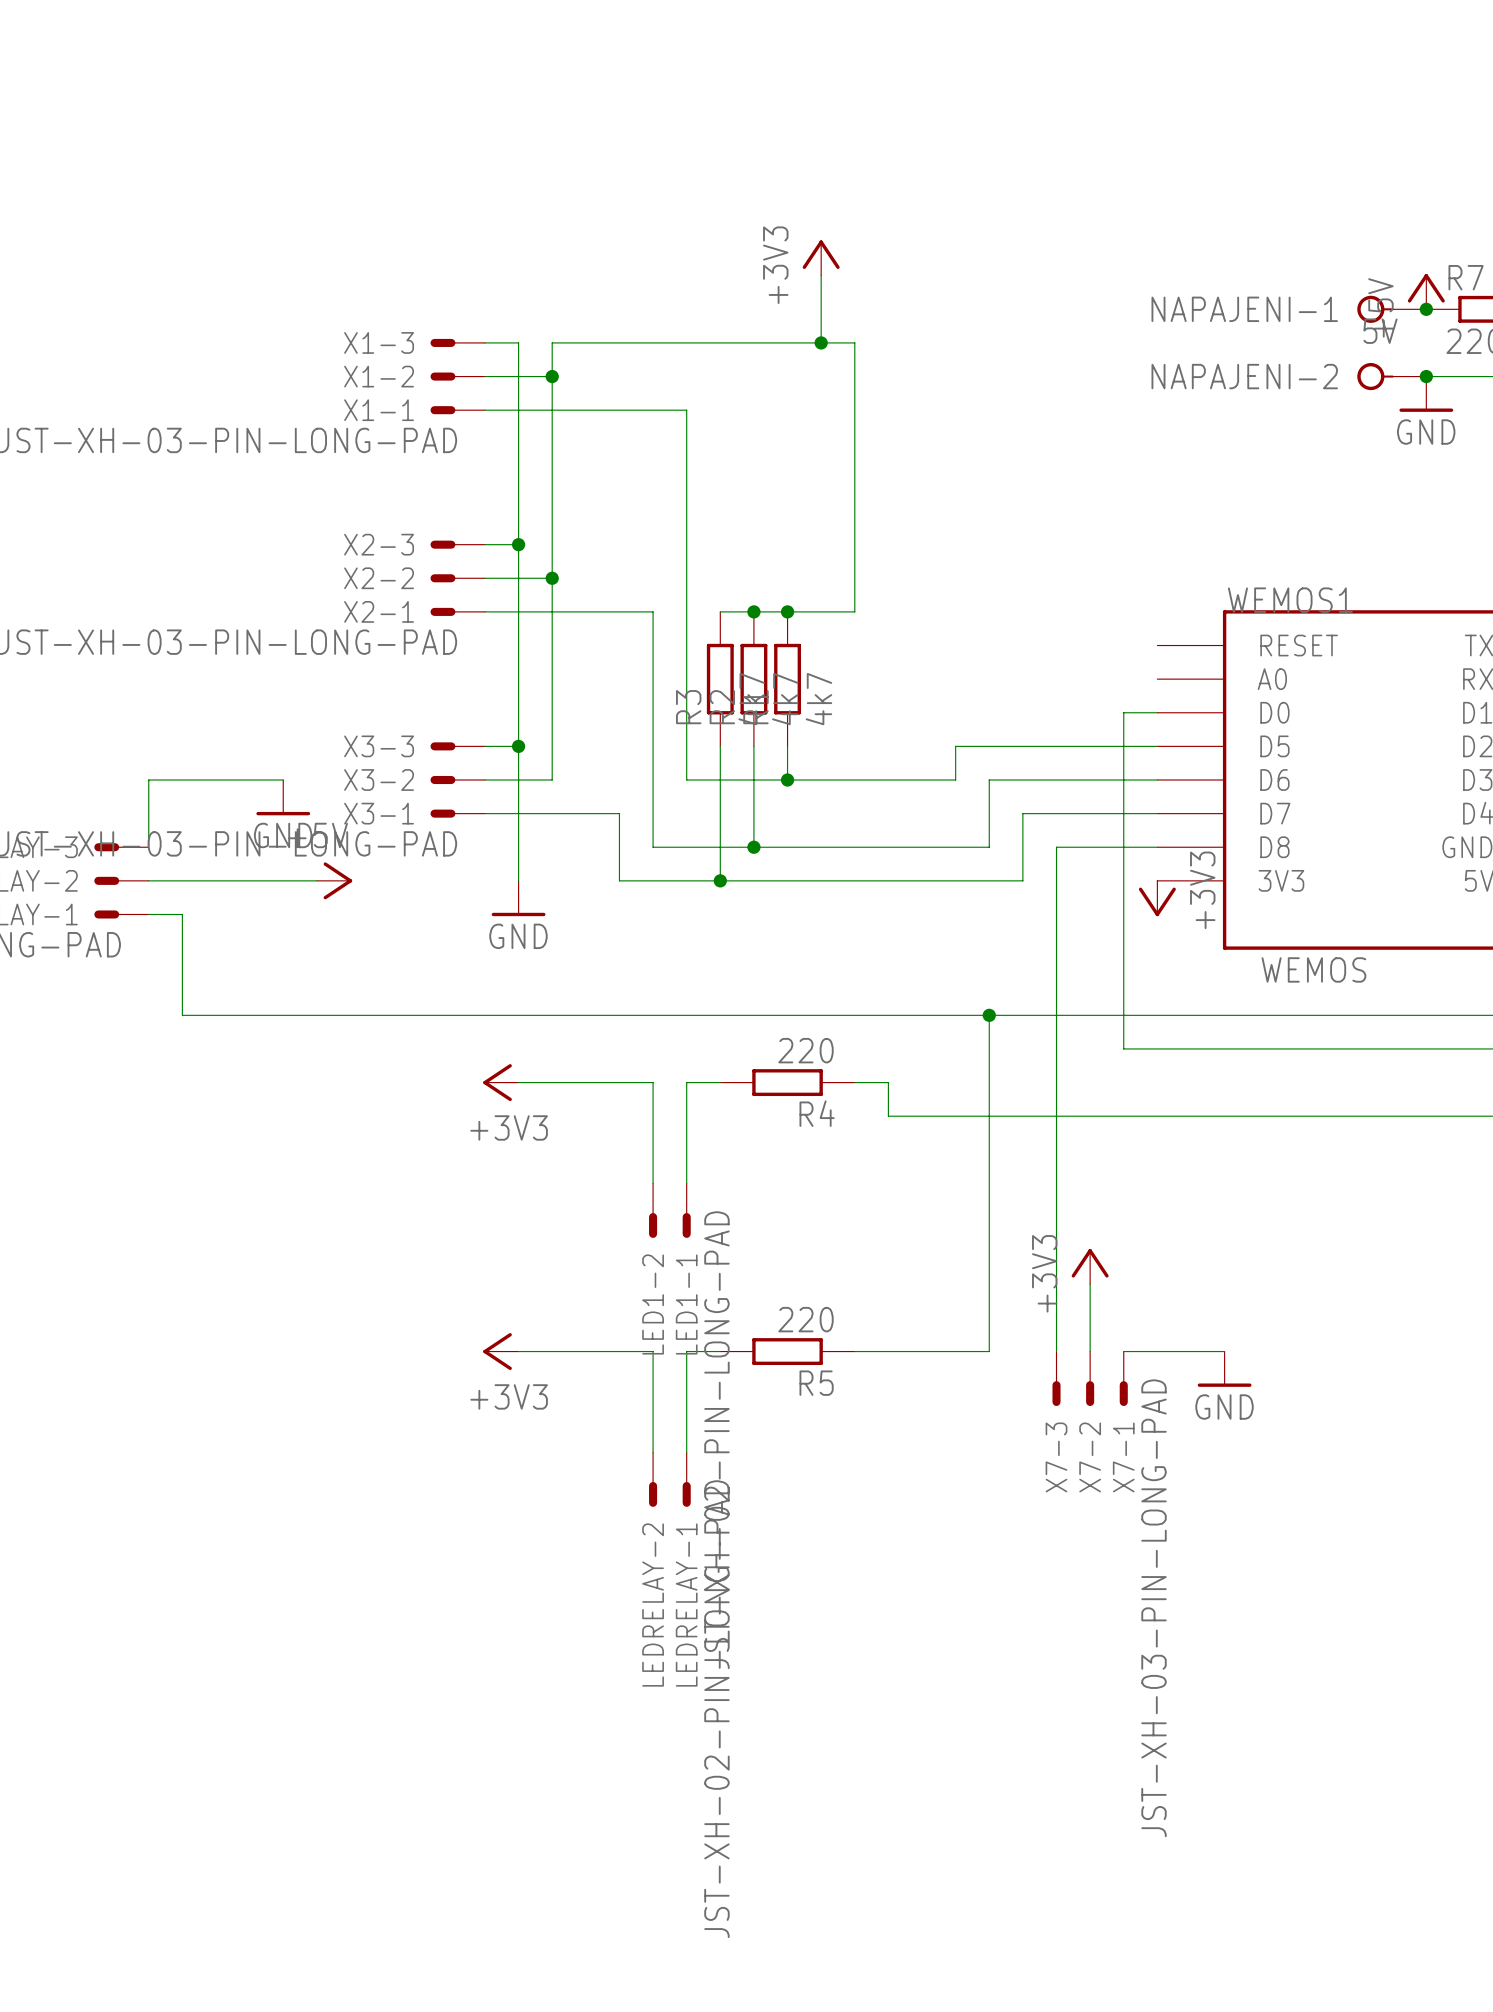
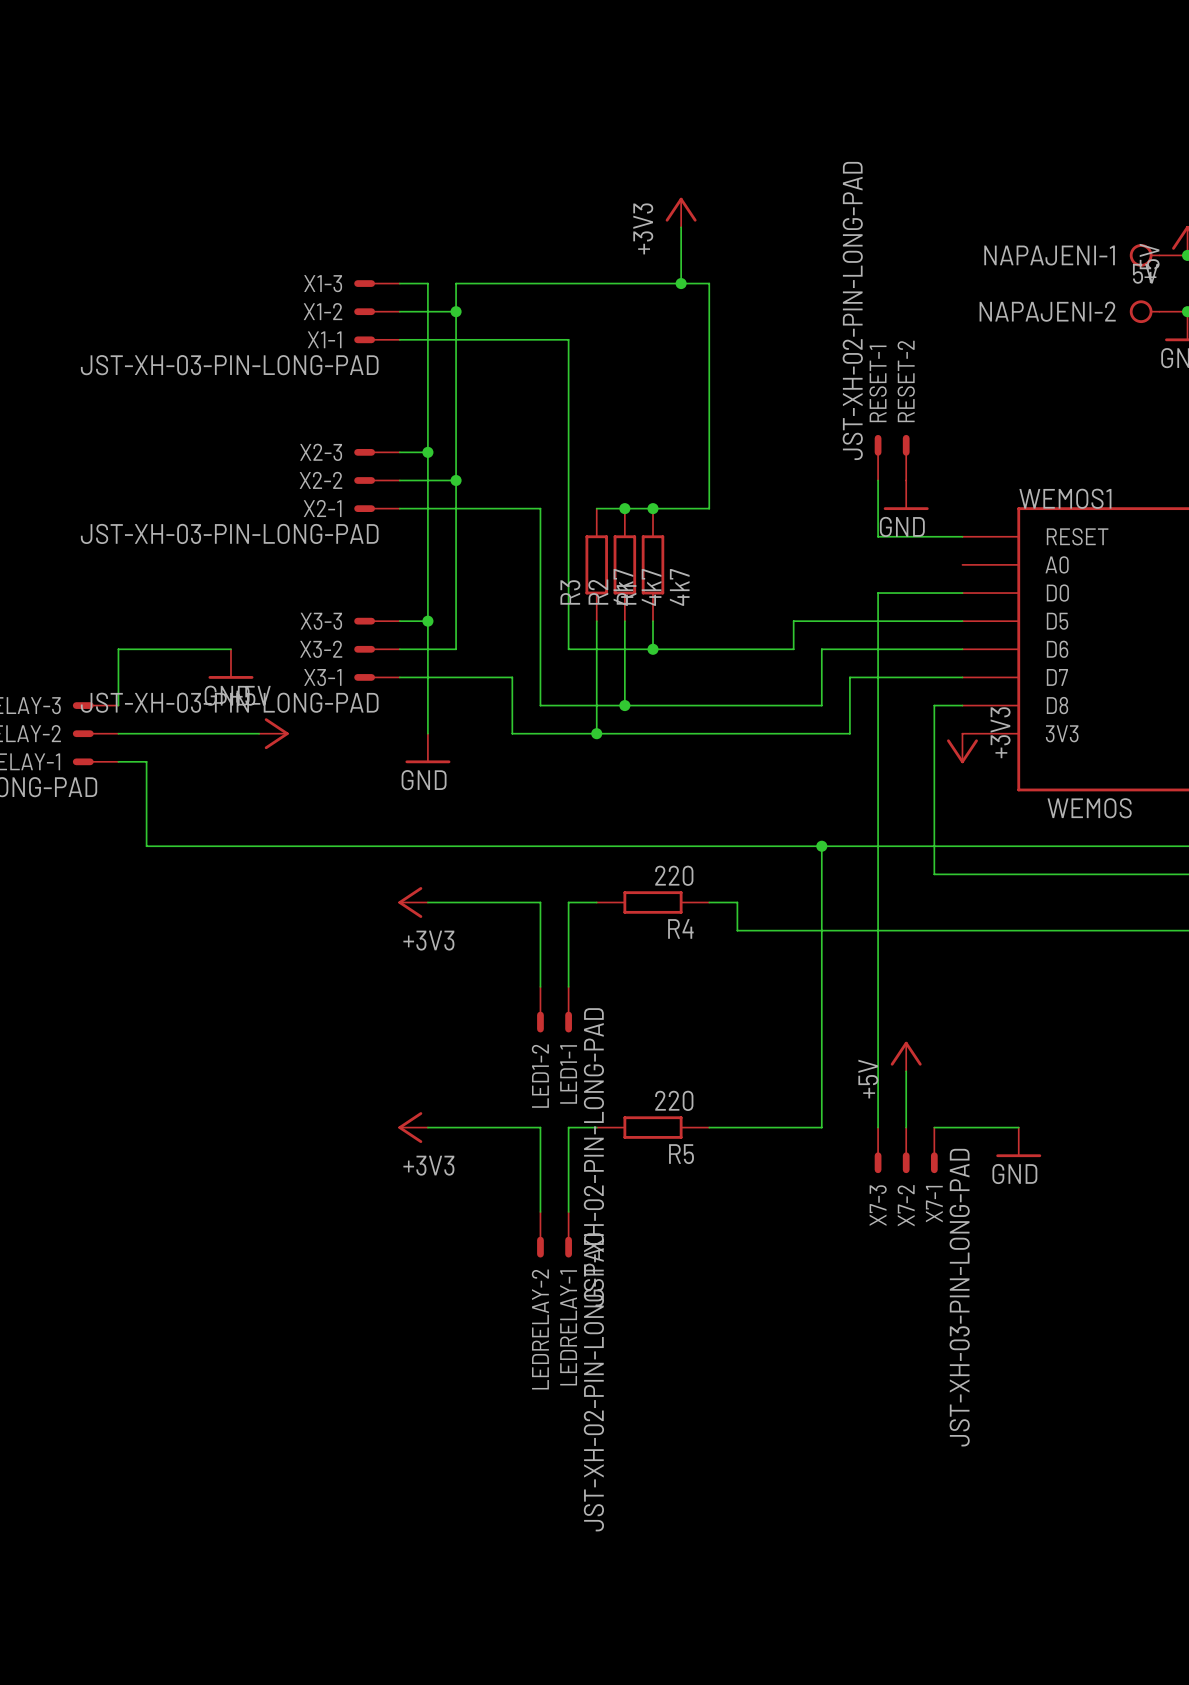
RESET-1: none -> JST-XH-02-PIN-LONG-PAD (878, 457)
RESET-2: none -> (906, 457)
wire: none -> (878, 480) (878, 536) (962, 536)
power symbol: none -> GND (906, 495)
wire: (1123, 712) (1123, 847) (1056, 847) -> (934, 593) (878, 593) (878, 705)
power symbol: +3V3 (1090, 1266) -> +5V (906, 1056)

